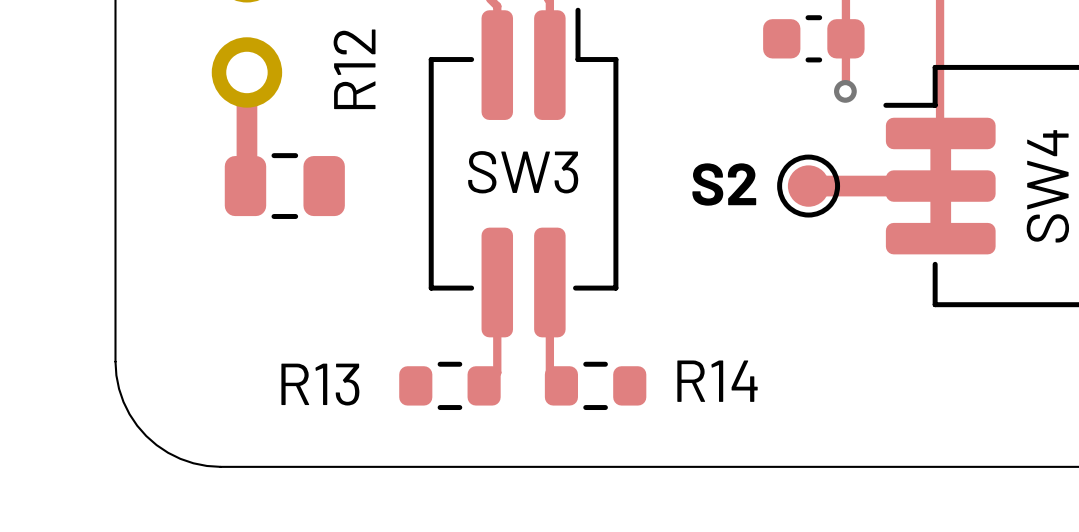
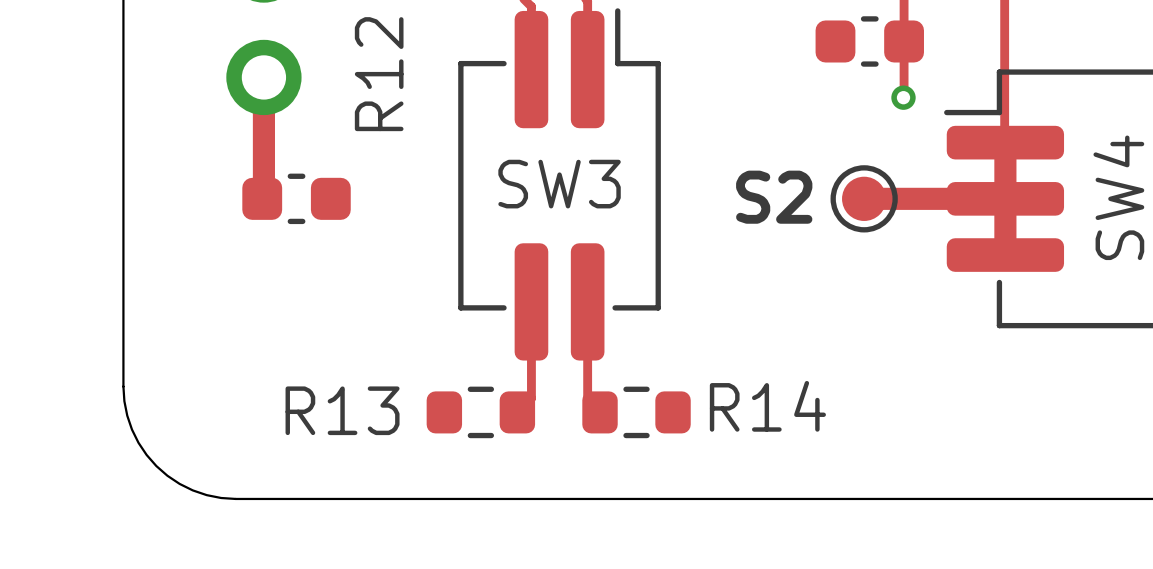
part footprint: [224, 153, 345, 219] -> [242, 173, 351, 225]

